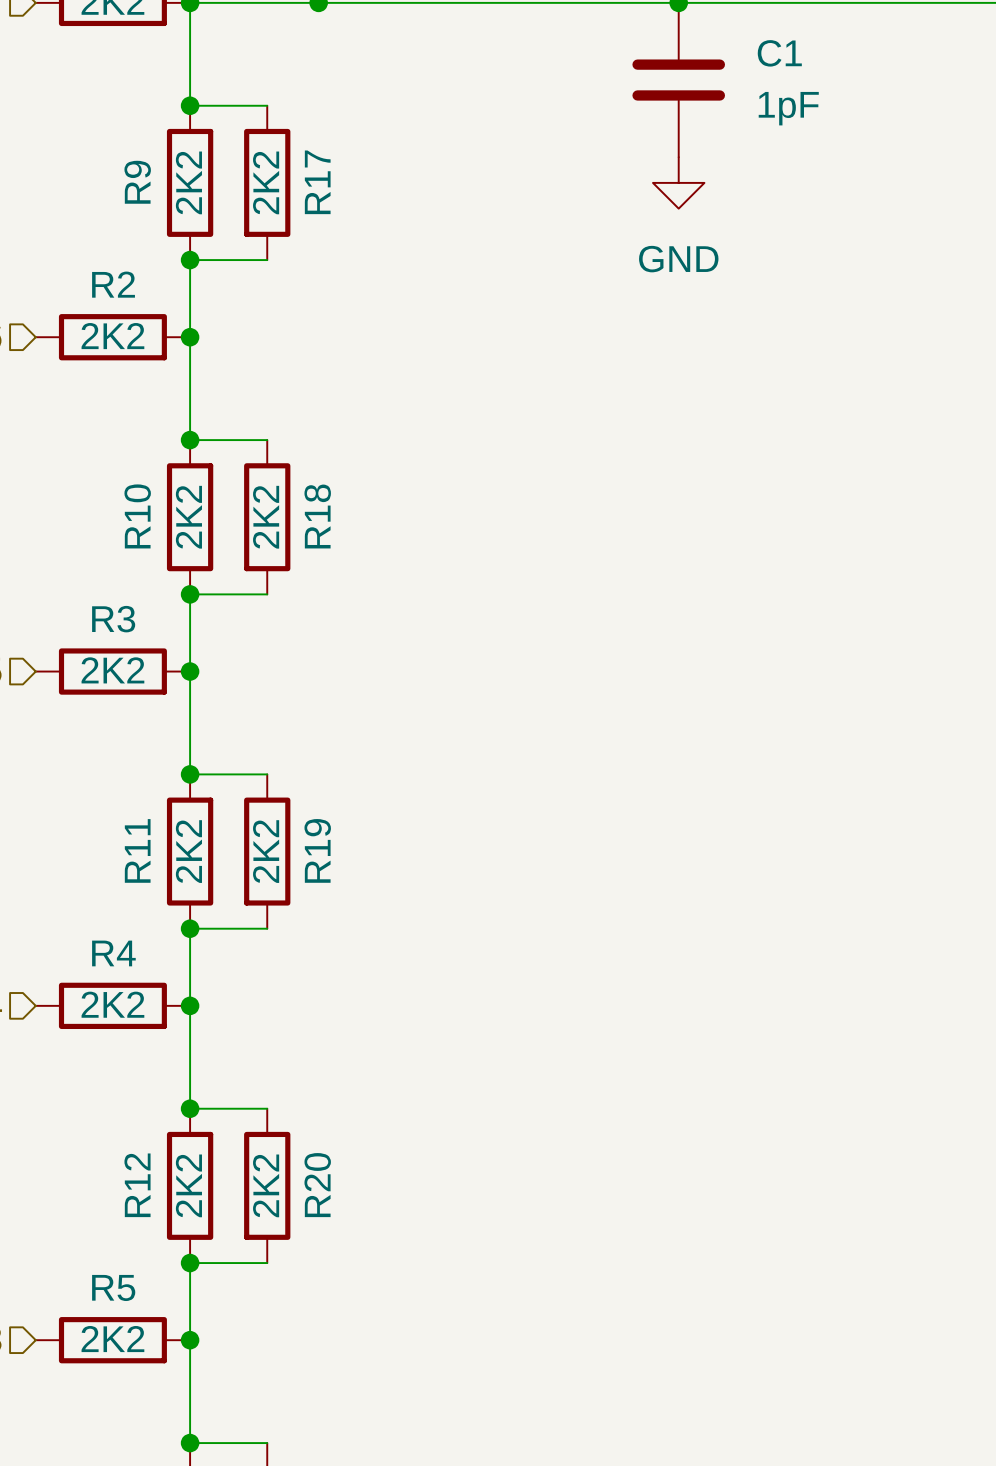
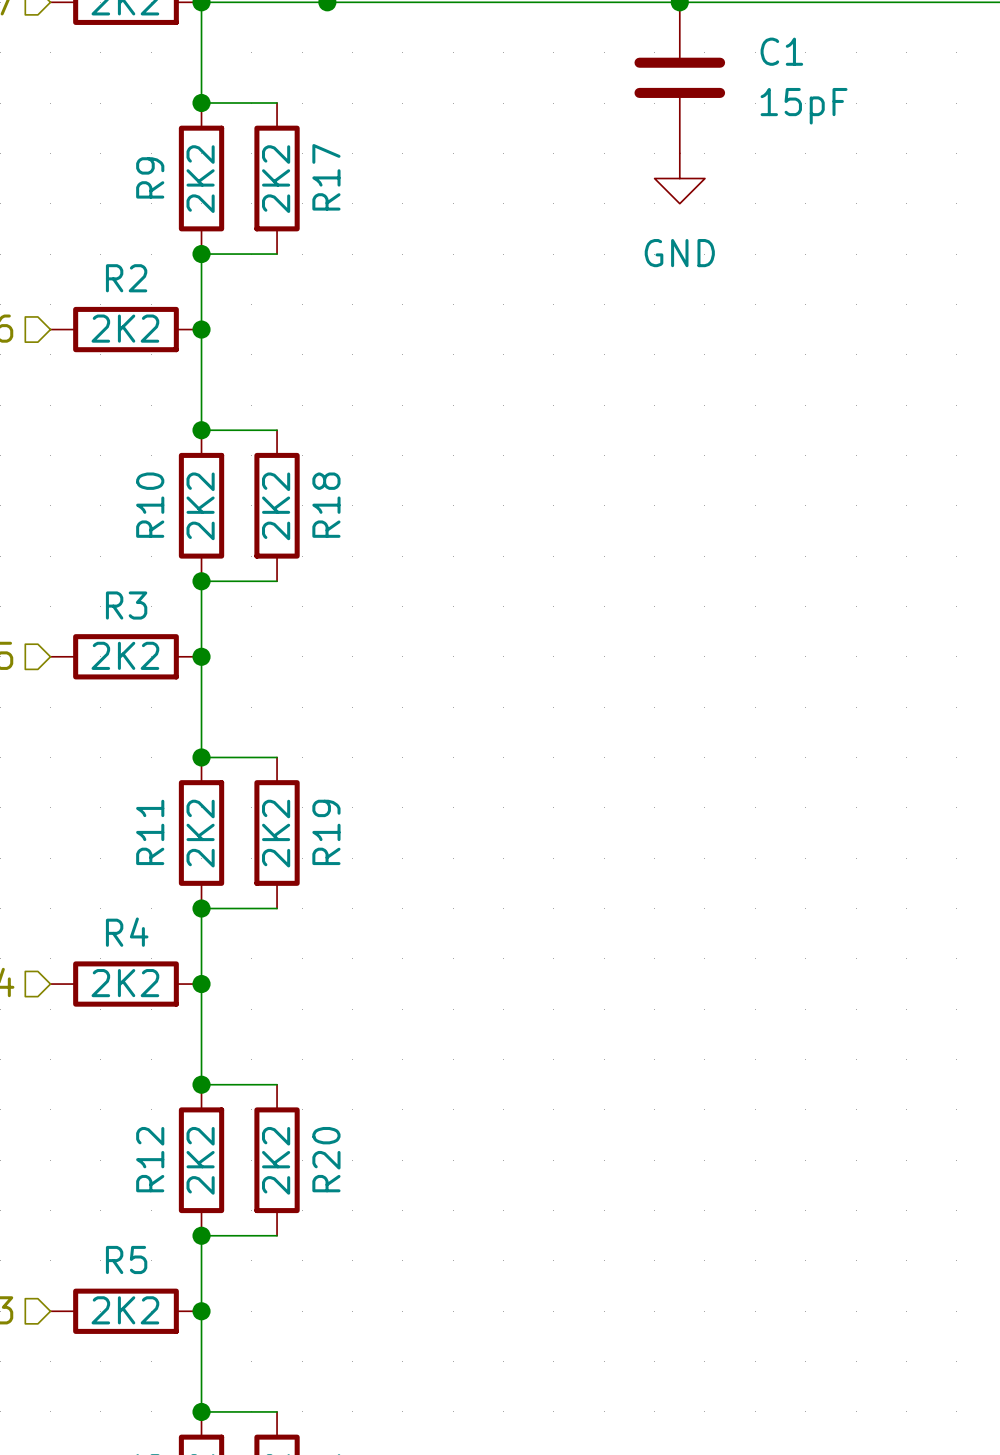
C1 value: 1pF (788, 108) -> 15pF (804, 106)

